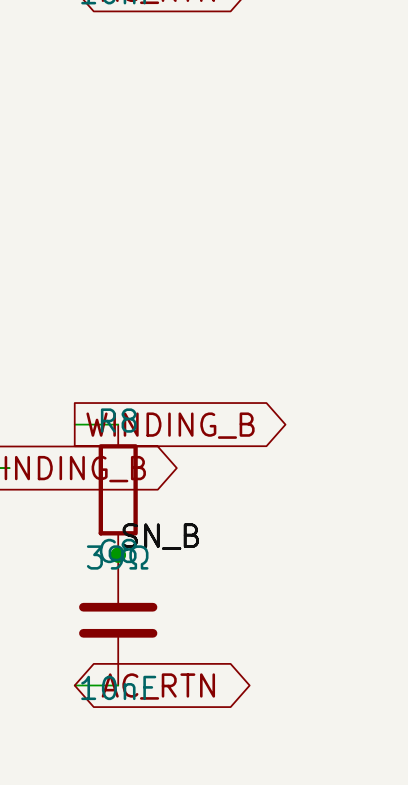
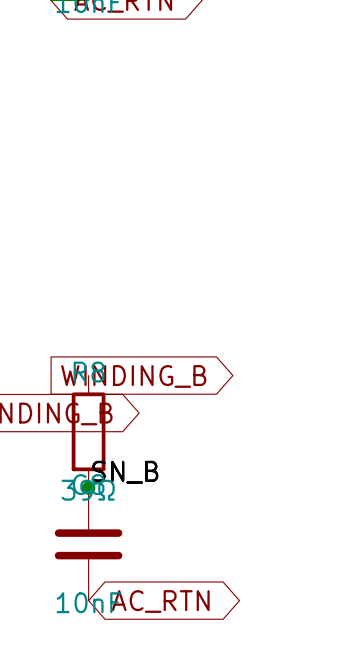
wire: (74, 424) (118, 424) -> none
wire: (74, 685) (118, 685) -> none
global label position: AC_RTN (158, 686) -> AC_RTN (160, 601)

